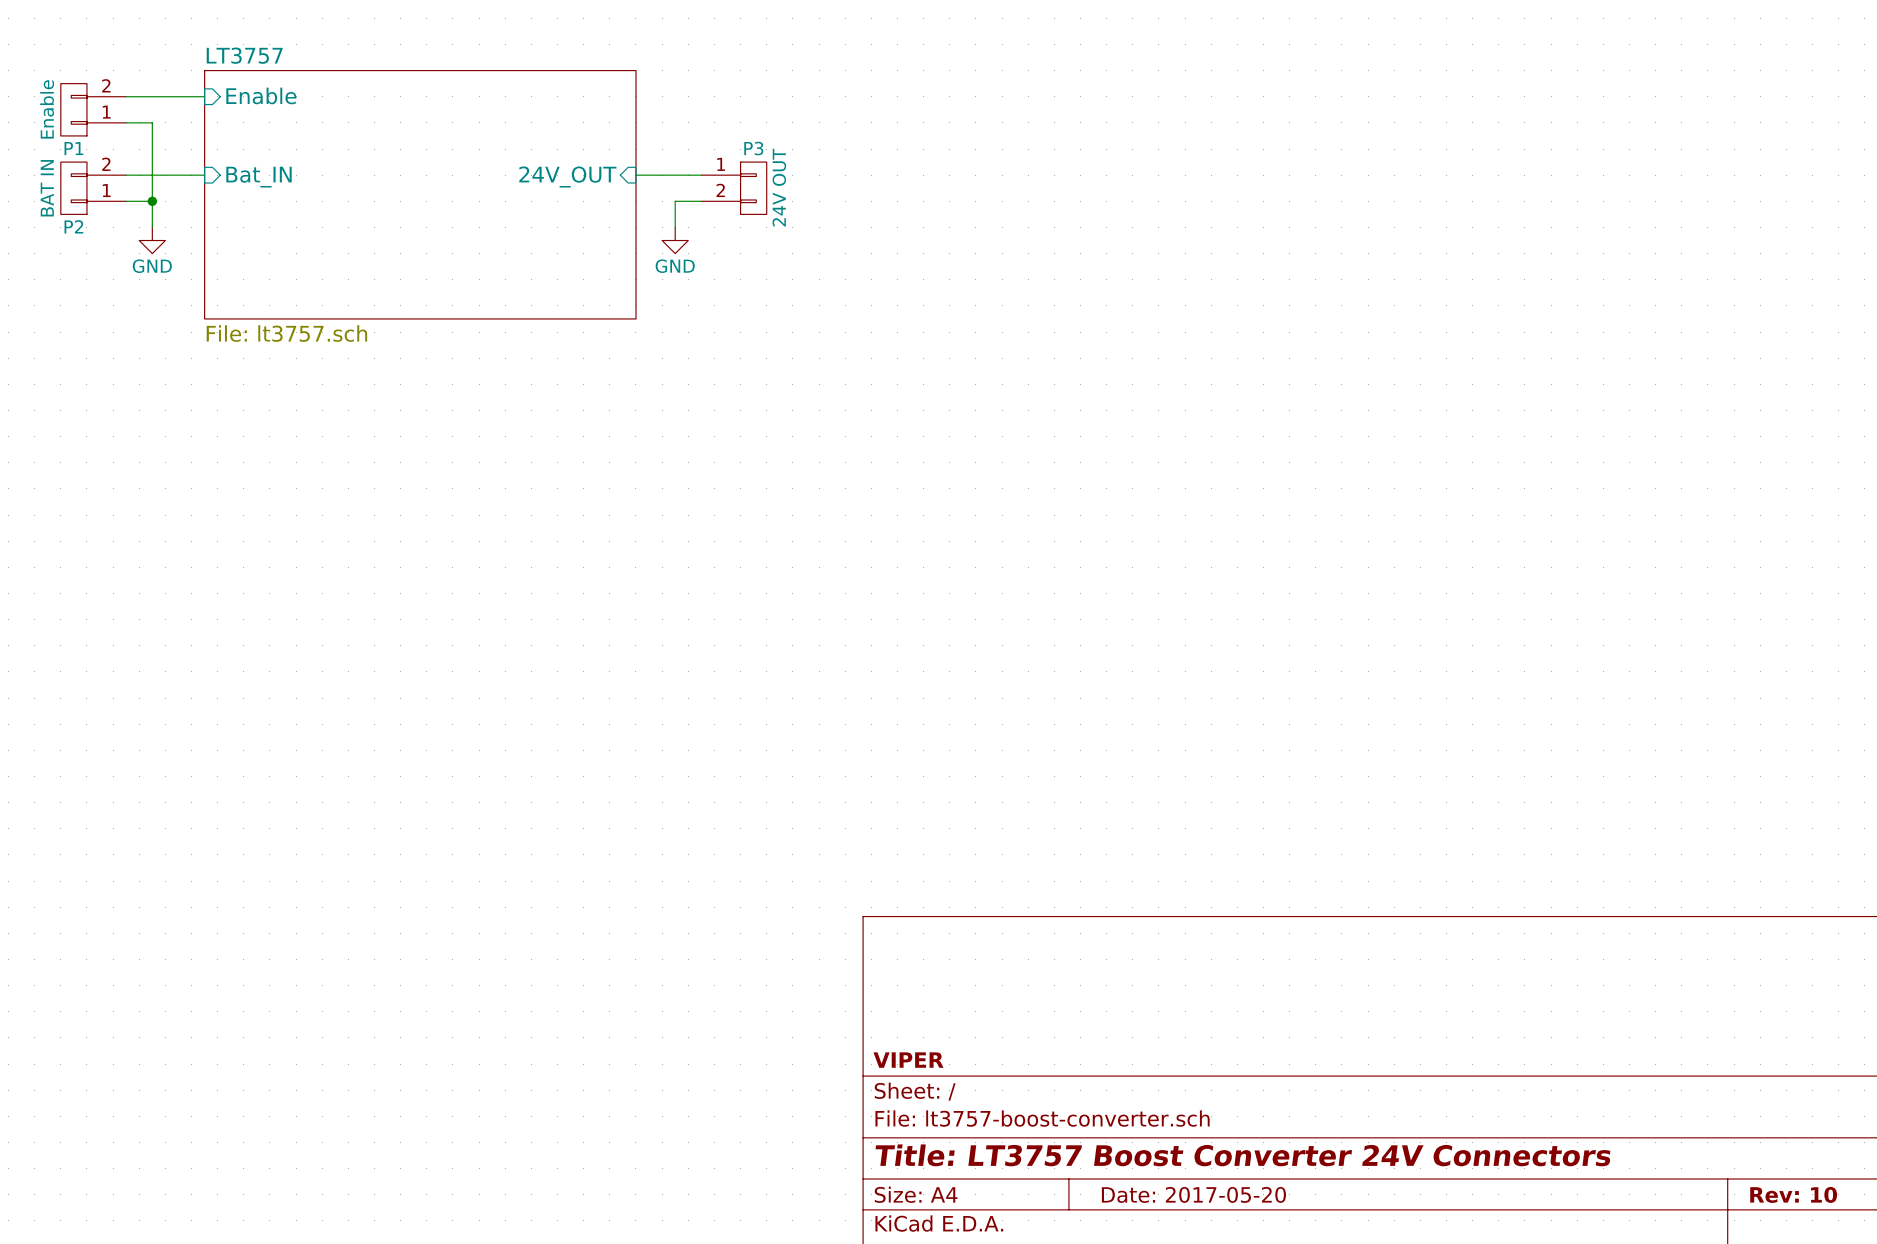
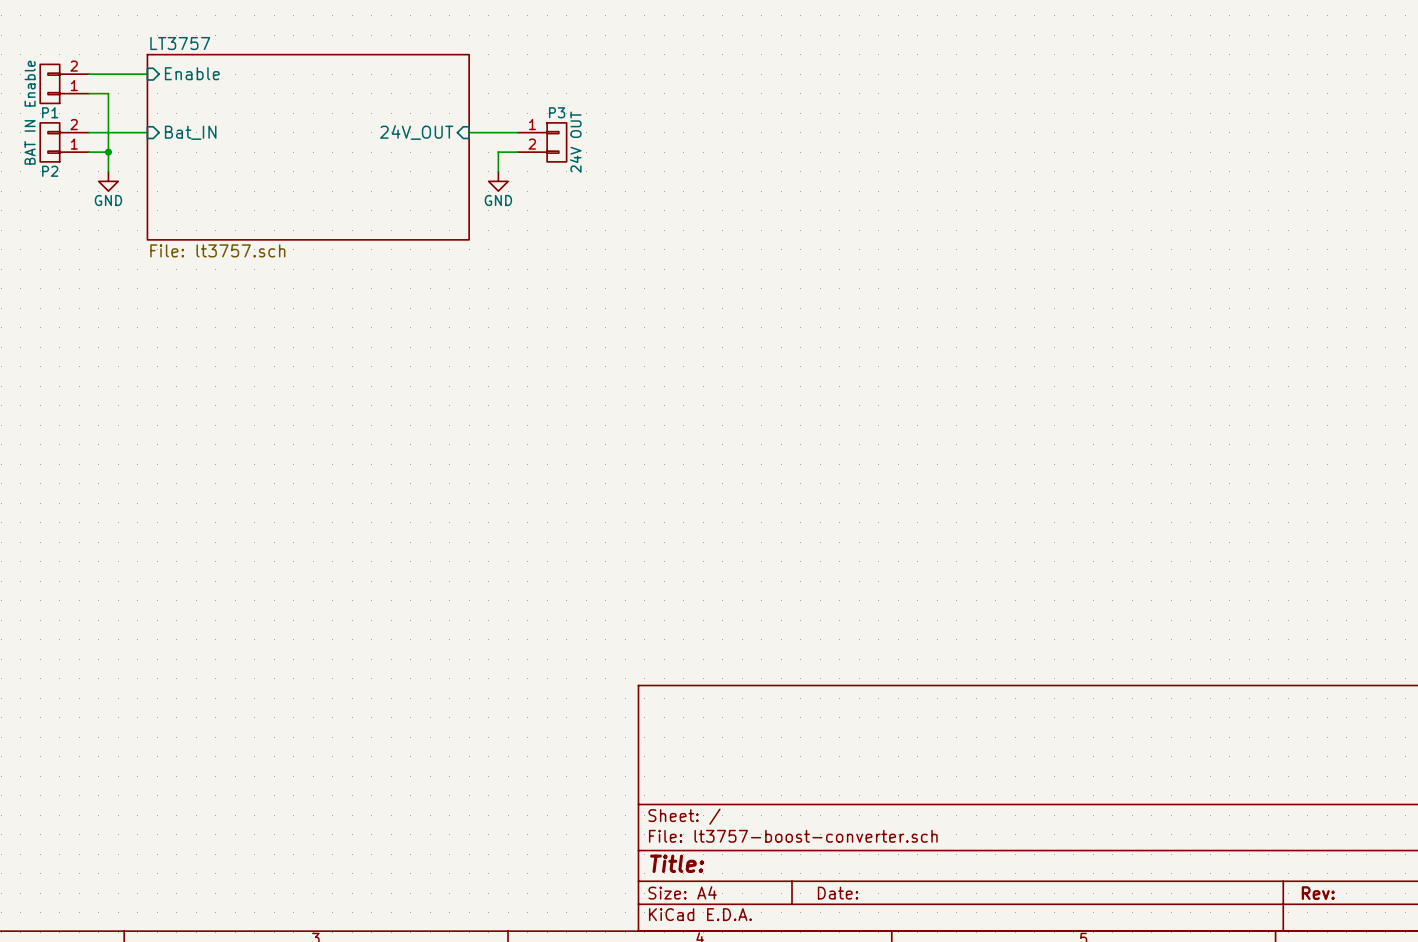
title block: VIPER (908, 1060) -> none
title block: Title: LT3757 Boost Converter 24V Connectors (1242, 1155) -> Title: (677, 863)
title block: Date: 2017-05-20 (1193, 1194) -> Date: (838, 893)
title block: Rev: 10 (1793, 1194) -> Rev: (1318, 893)

